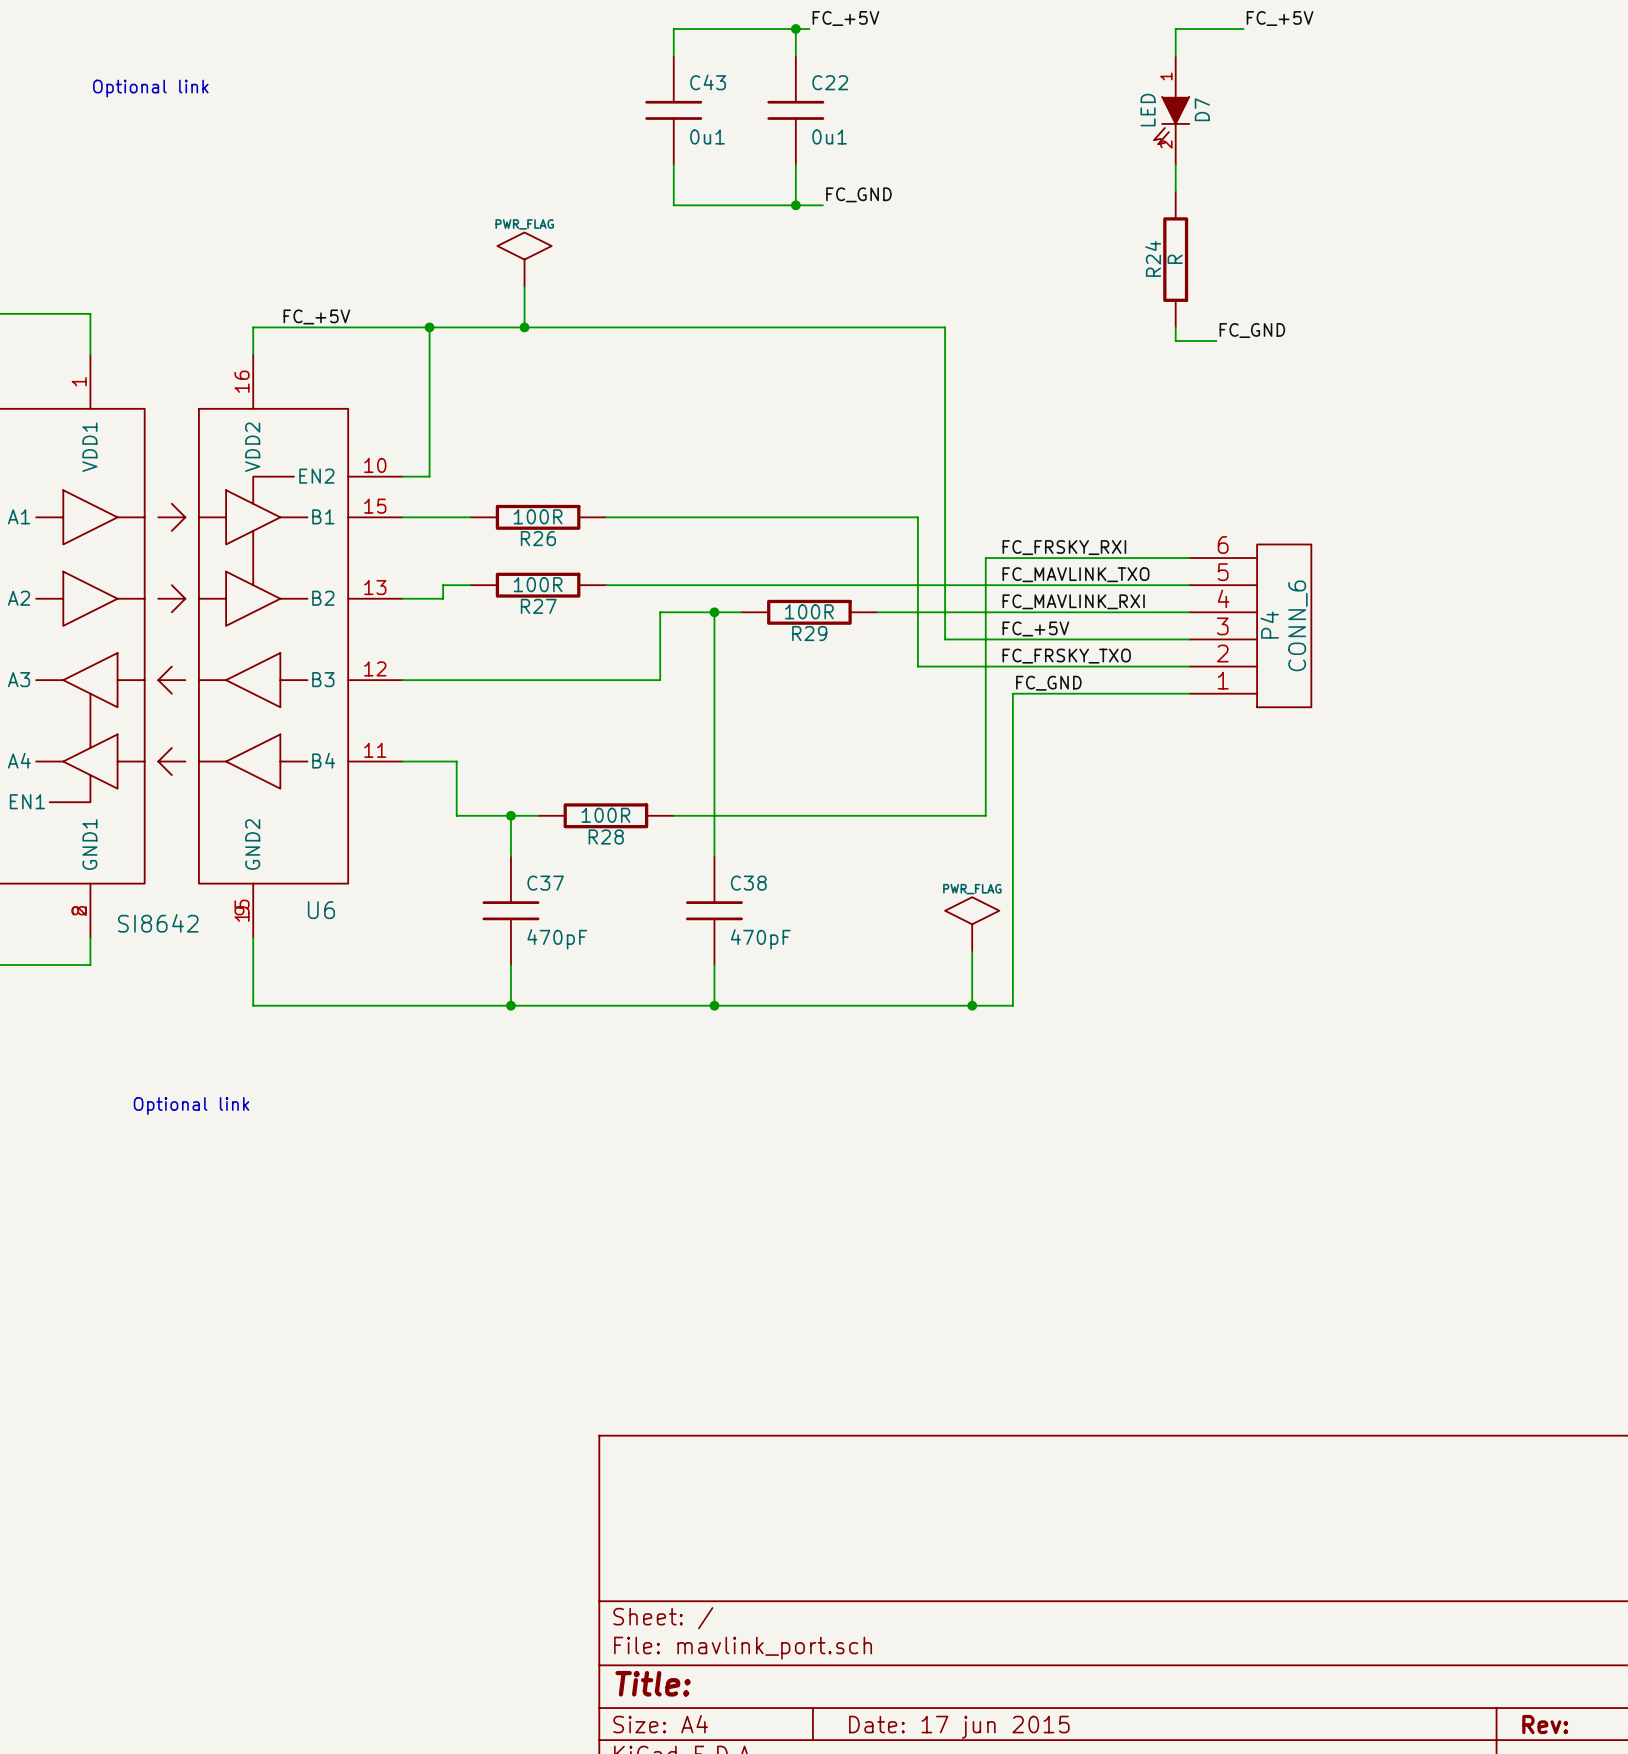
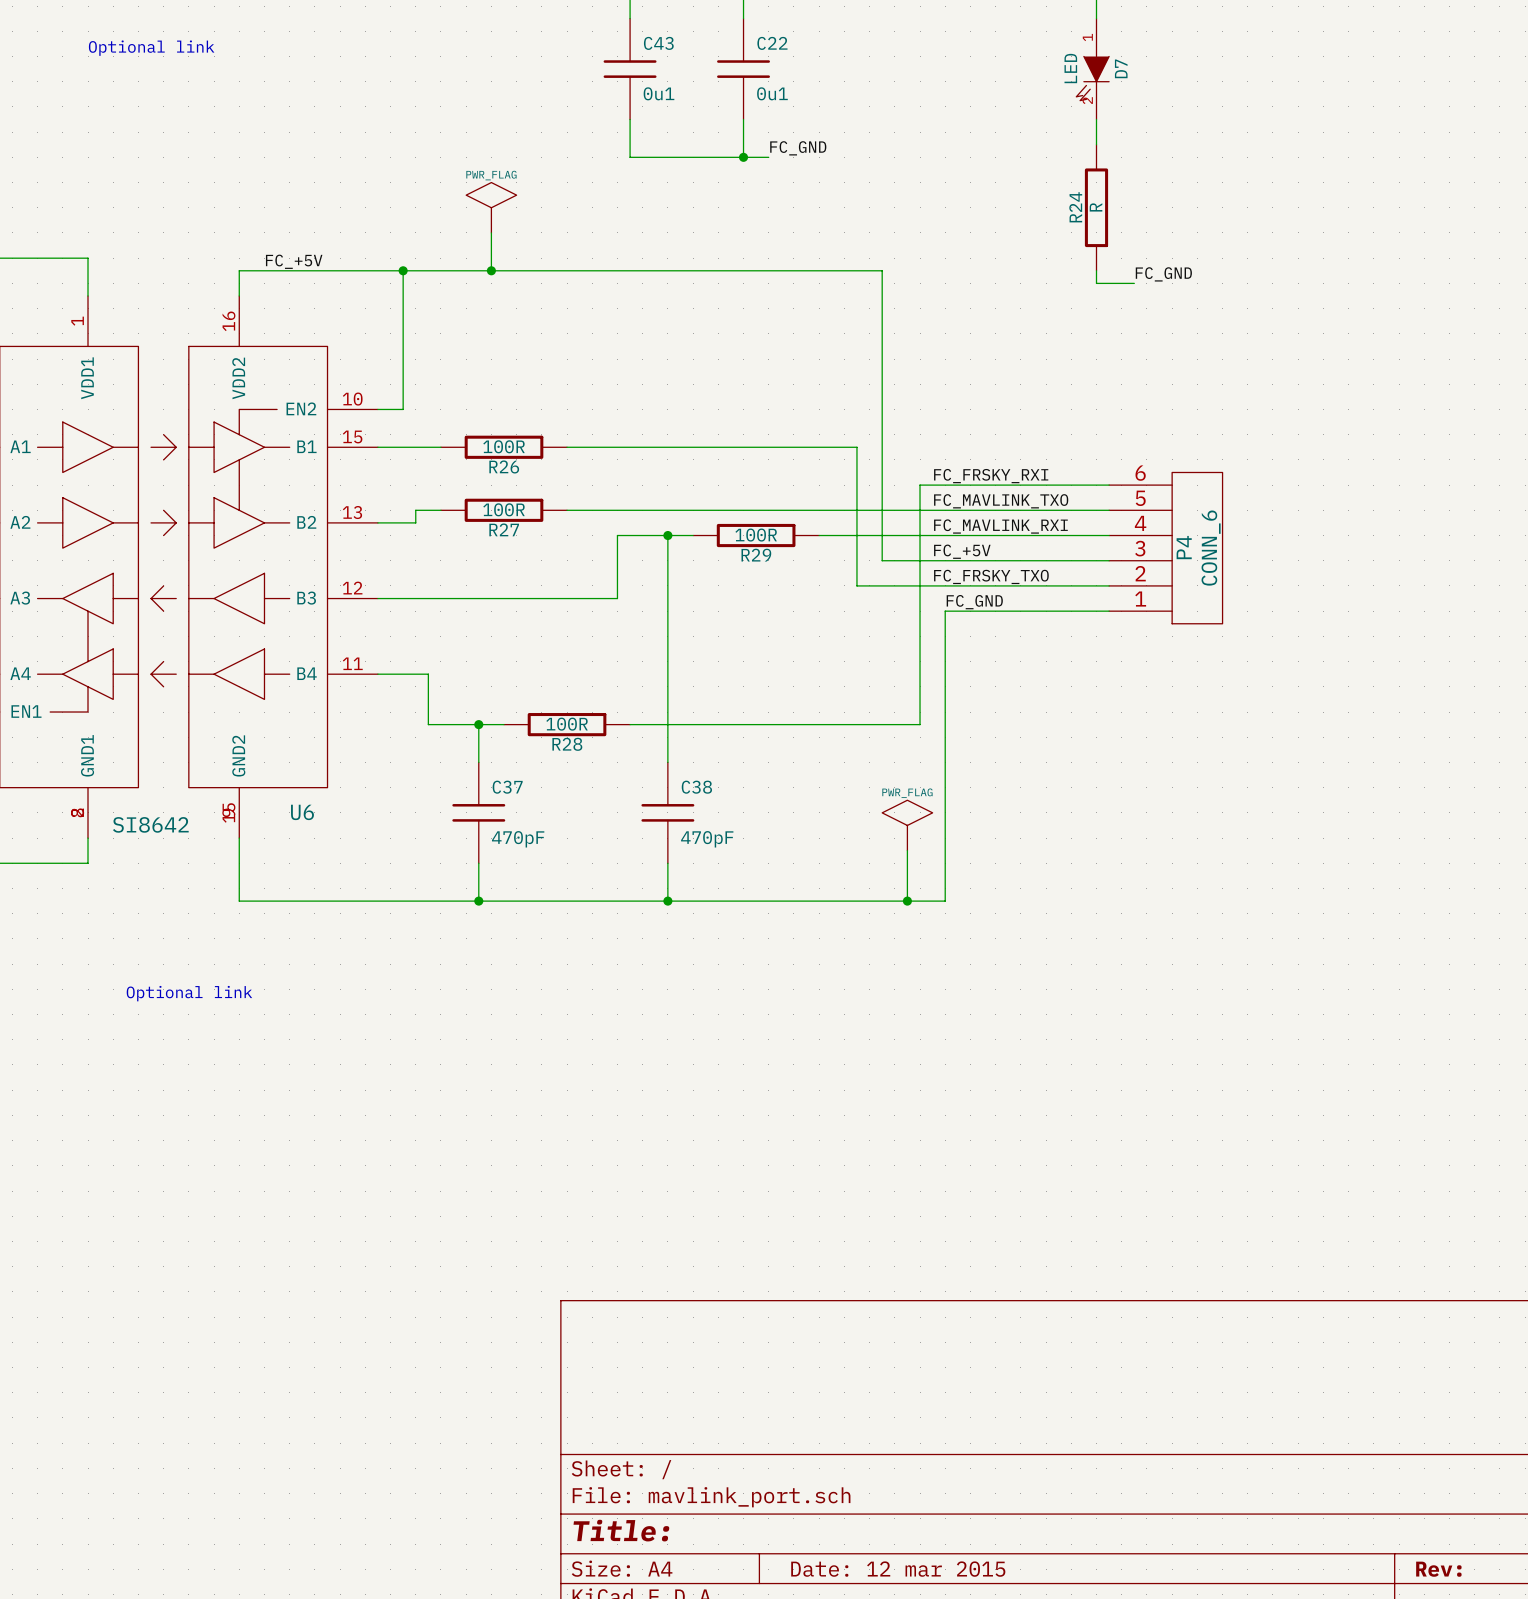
title block: Date: 17 jun 2015 (959, 1727) -> Date: 12 mar 2015 (898, 1569)

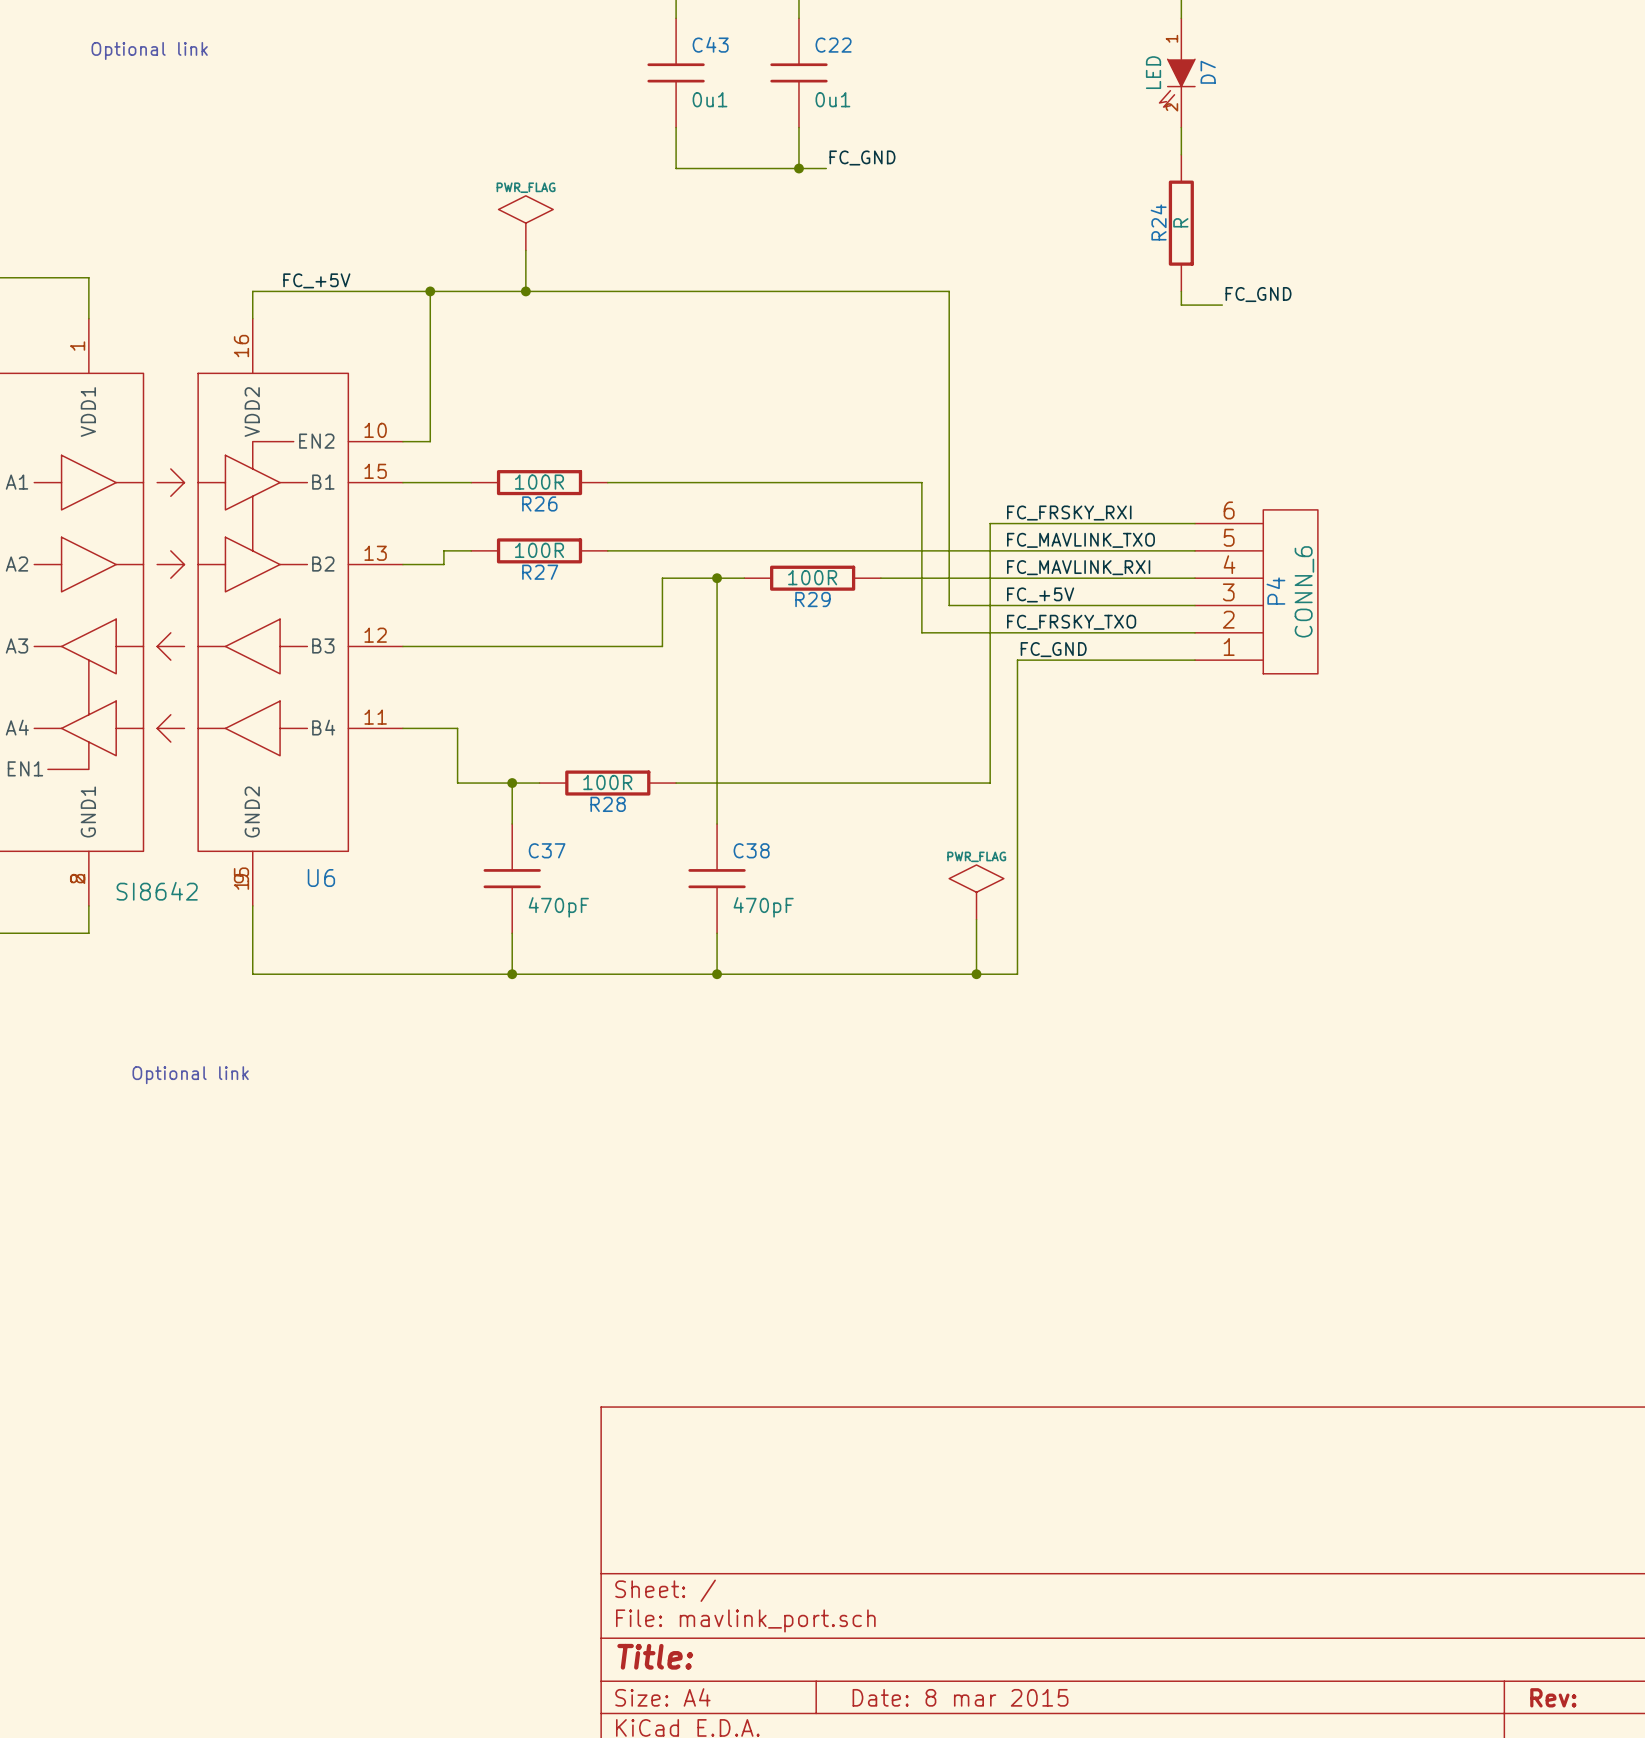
title block: Date: 12 mar 2015 (898, 1569) -> Date: 8 mar 2015 (960, 1697)

